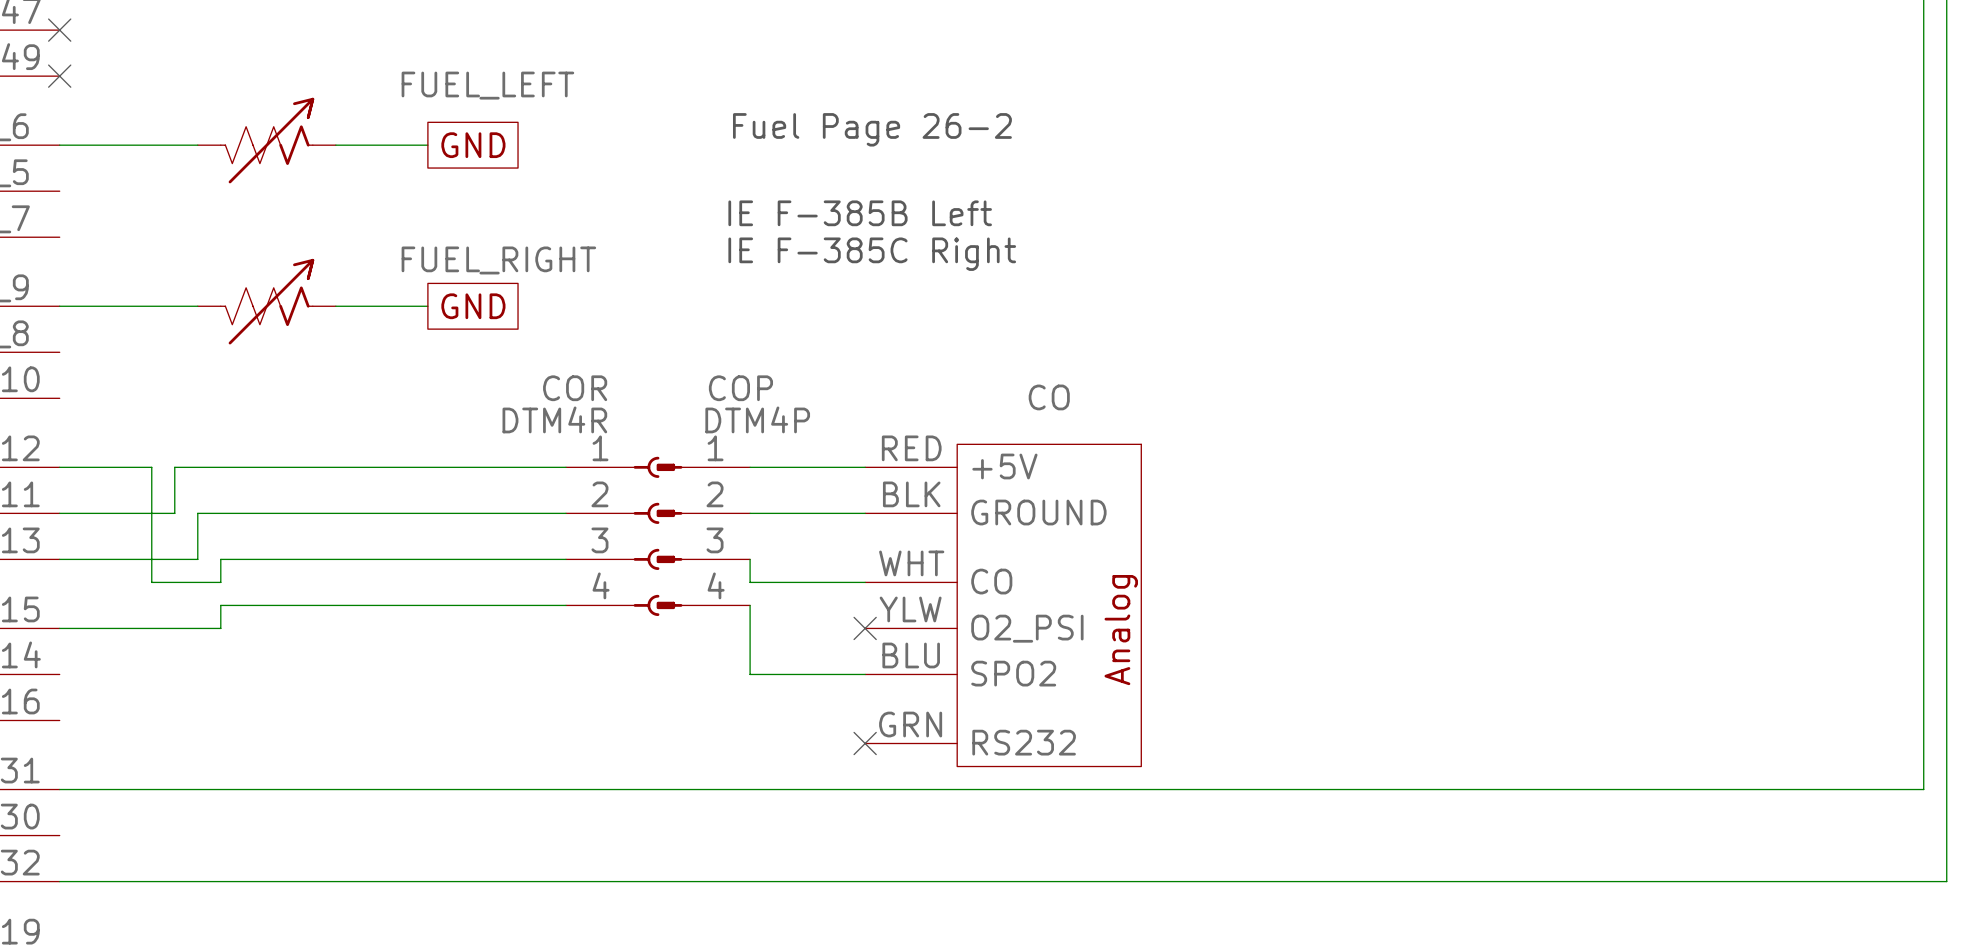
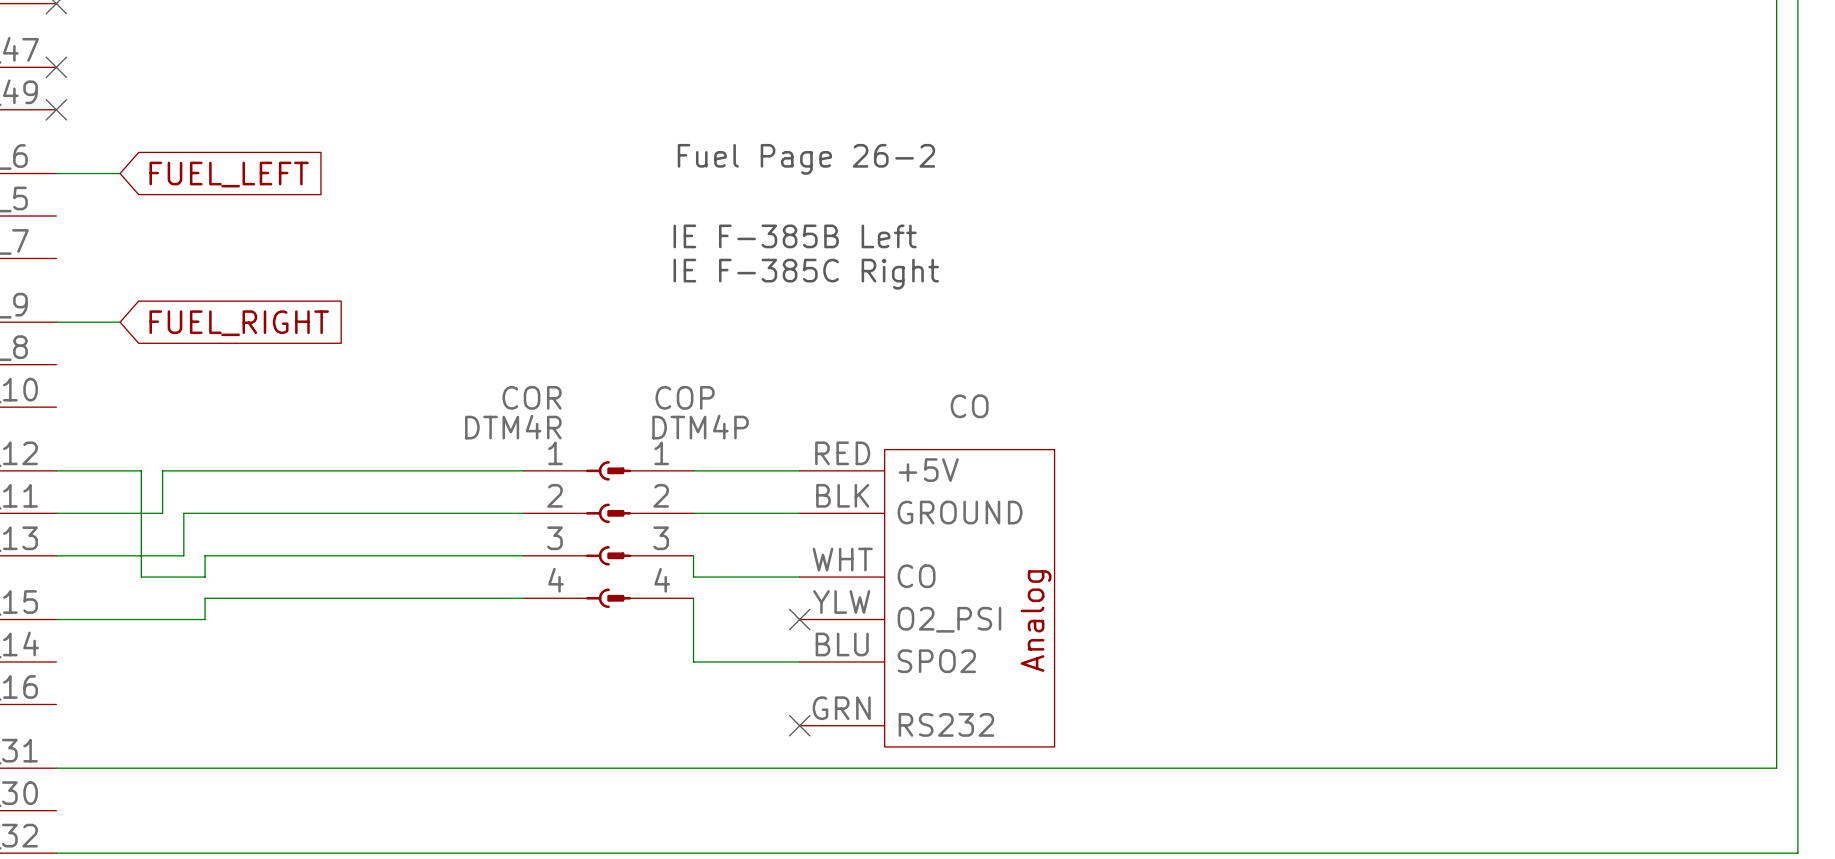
FUEL_LEFT: (266, 140) -> none
wire: (128, 145) (197, 145) -> none
wire: (335, 145) (427, 145) -> none
global label: GND (473, 145) -> none
global label: none -> FUEL_LEFT (229, 174)
FUEL_RIGHT: (266, 301) -> none
wire: (128, 306) (197, 306) -> none
wire: (335, 306) (427, 306) -> none
global label: GND (473, 306) -> none
global label: none -> FUEL_RIGHT (239, 323)

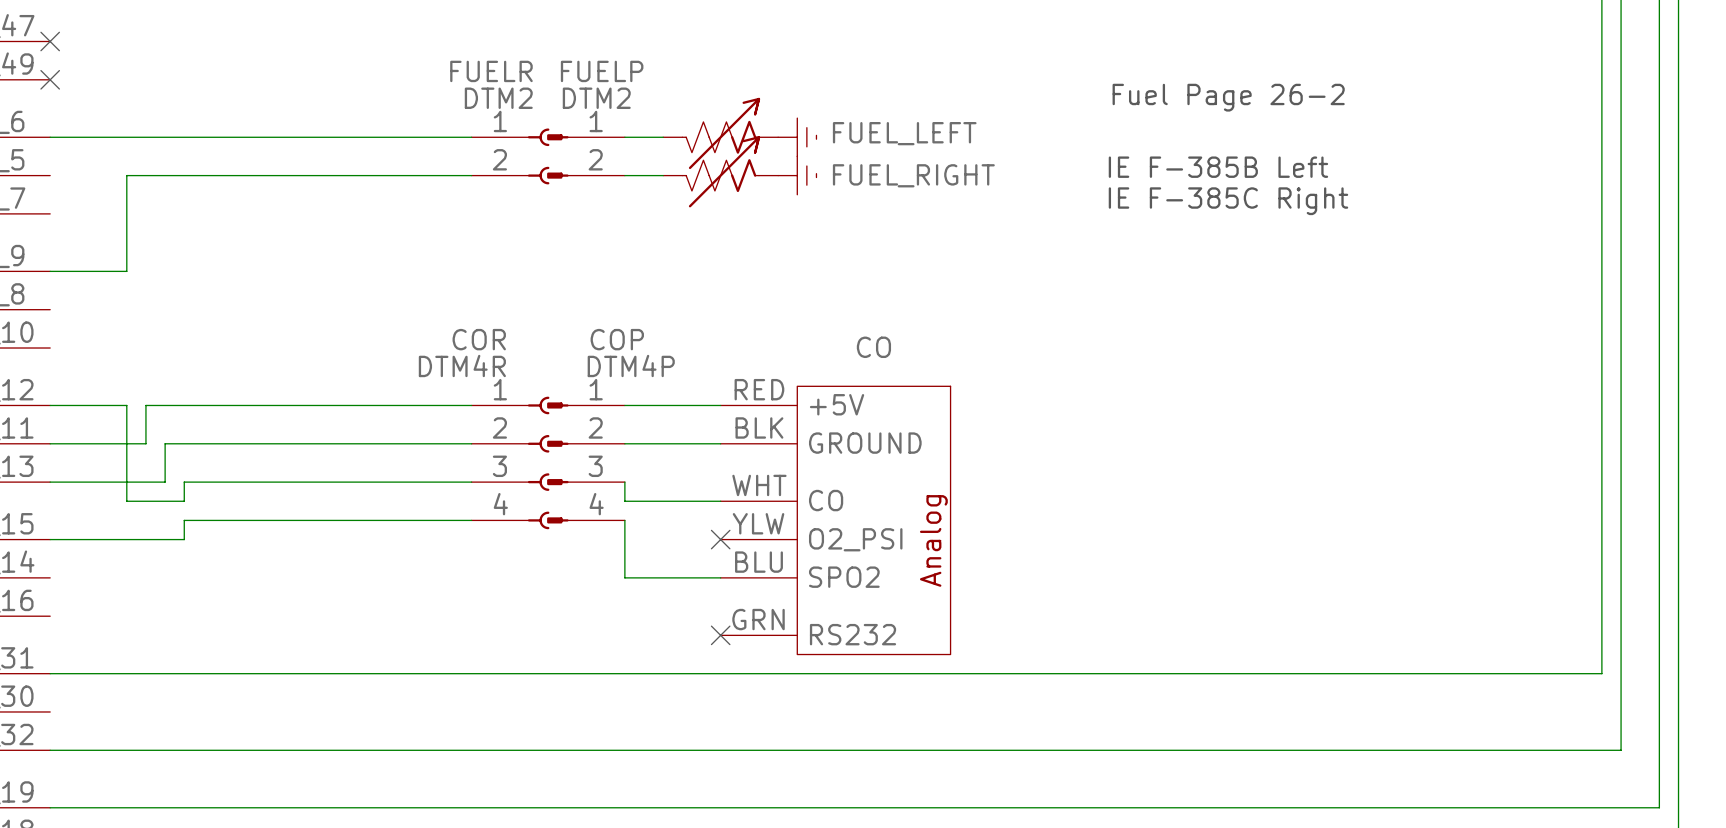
text: none -> Fuel Page 26-2 (1228, 97)
text: Fuel Page 26-2 (806, 159) -> none
FUEL_LEFT: none -> (720, 133)
wire: none -> (107, 137) (471, 137)
wire: none -> (624, 137) (663, 137)
power symbol: none -> (797, 137)
global label: FUEL_LEFT (229, 174) -> none
FUELR: none -> DTM2 (510, 156)
FUELP: none -> DTM2 (586, 156)
text: none -> IE F-385B Left (1218, 167)
FUEL_RIGHT: none -> (720, 171)
wire: none -> (471, 175) (126, 175) (126, 271) (107, 271)
wire: none -> (624, 175) (663, 175)
power symbol: none -> (797, 175)
text: IE F-385B Left (795, 236) -> none
text: none -> IE F-385C Right (1228, 201)
text: IE F-385C Right (806, 274) -> none
global label: FUEL_RIGHT (239, 323) -> none

